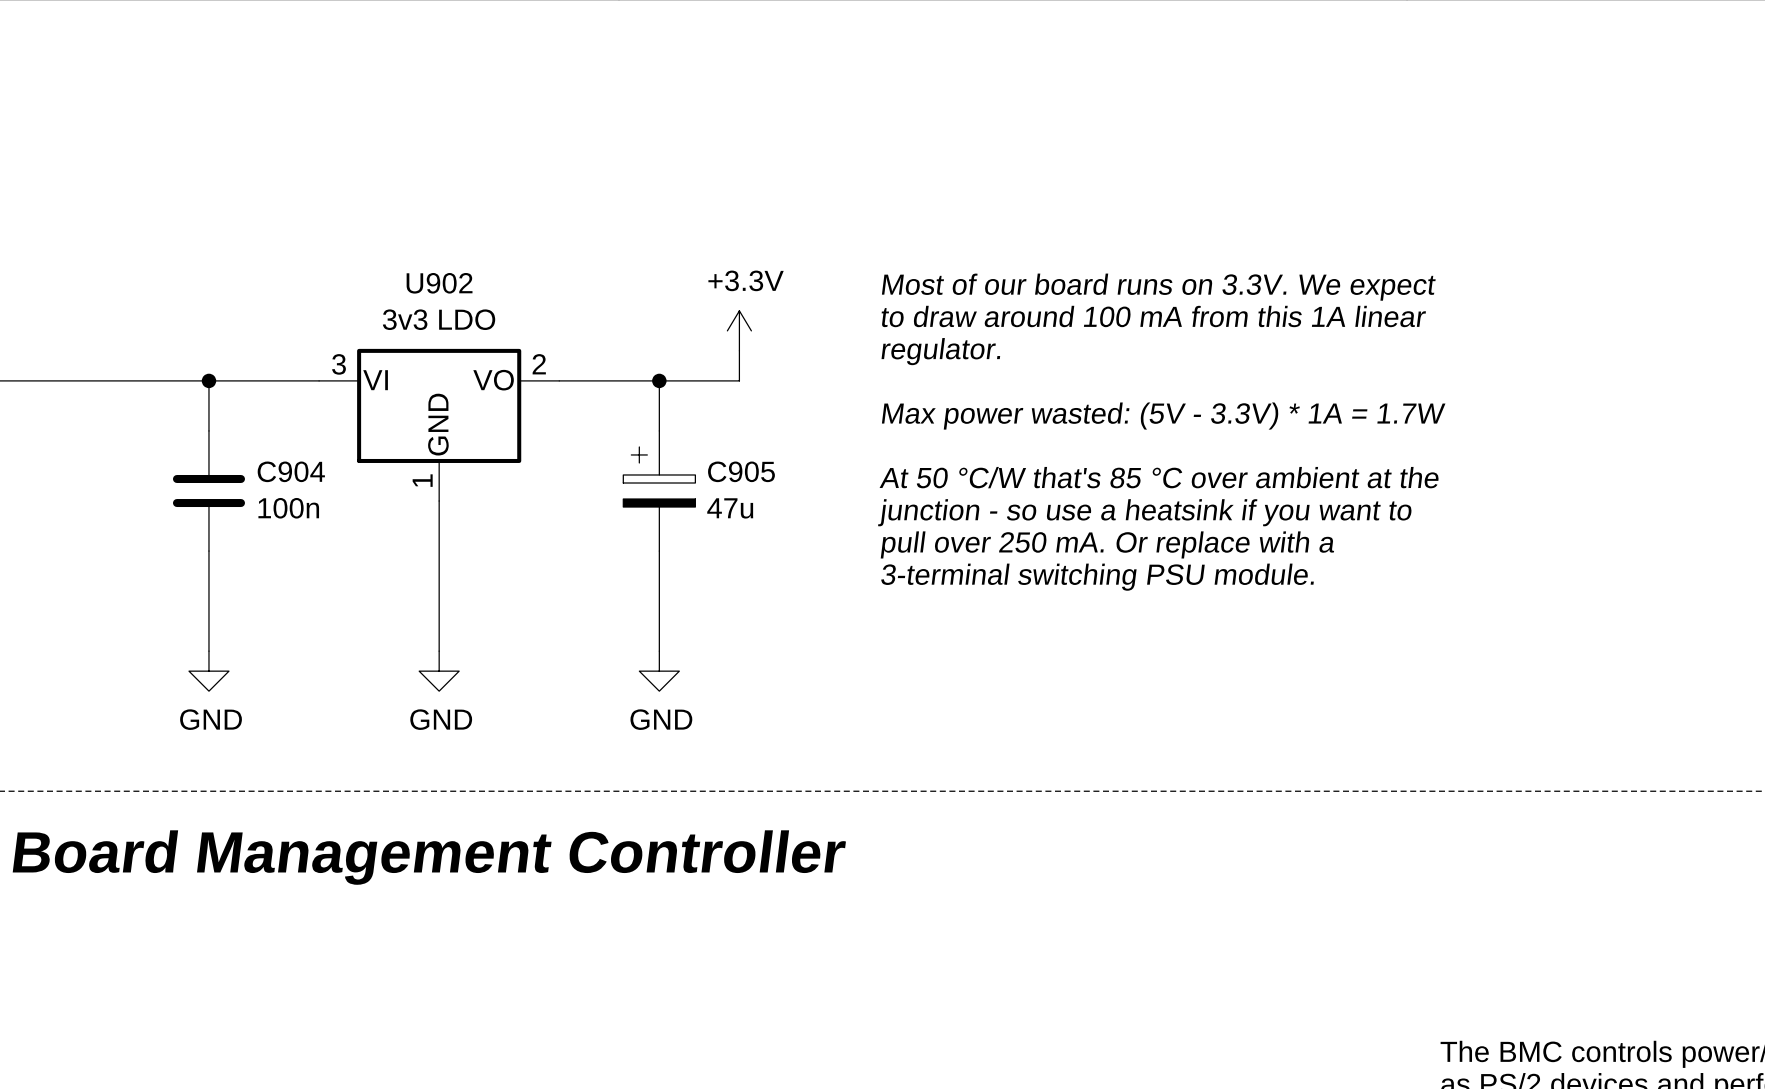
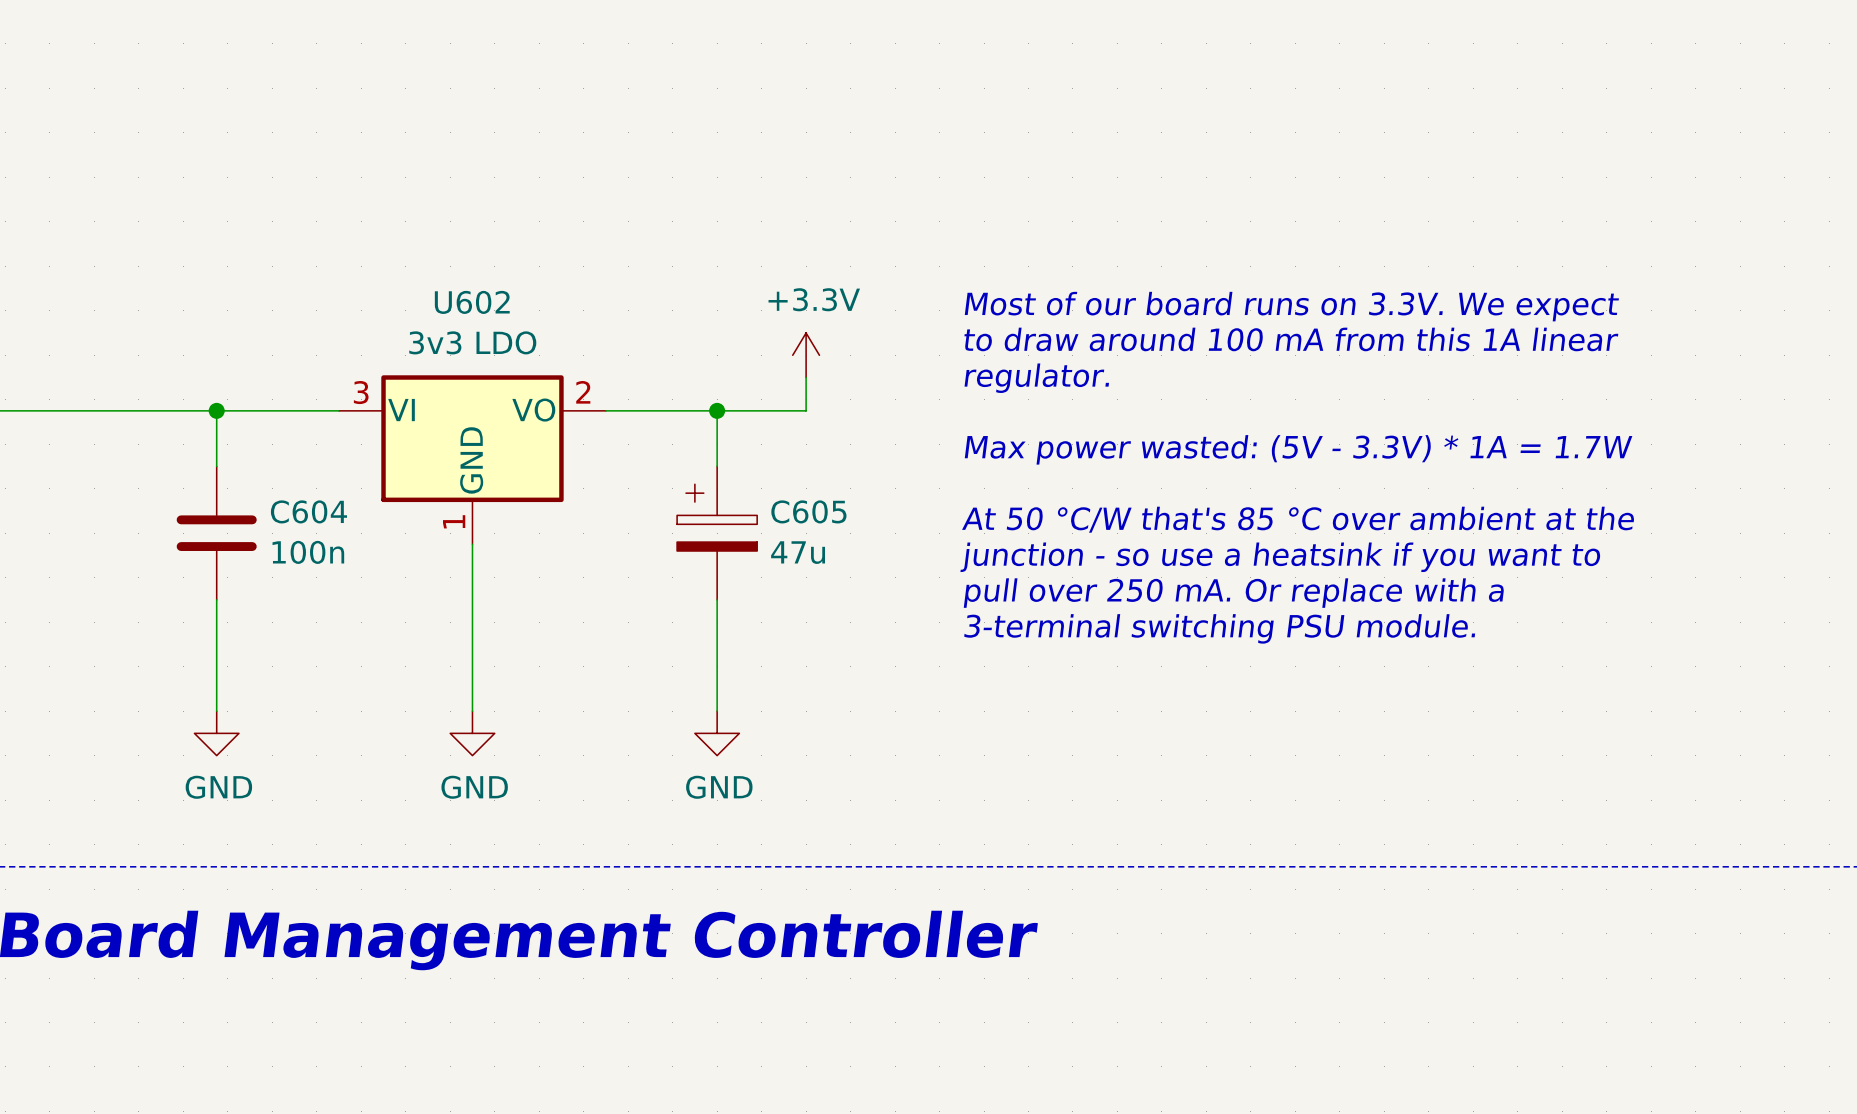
U902 name: U902 (439, 283) -> U602 (472, 302)
C904 name: C904 (291, 471) -> C604 (308, 511)
C905 name: C905 (741, 471) -> C605 (808, 511)

